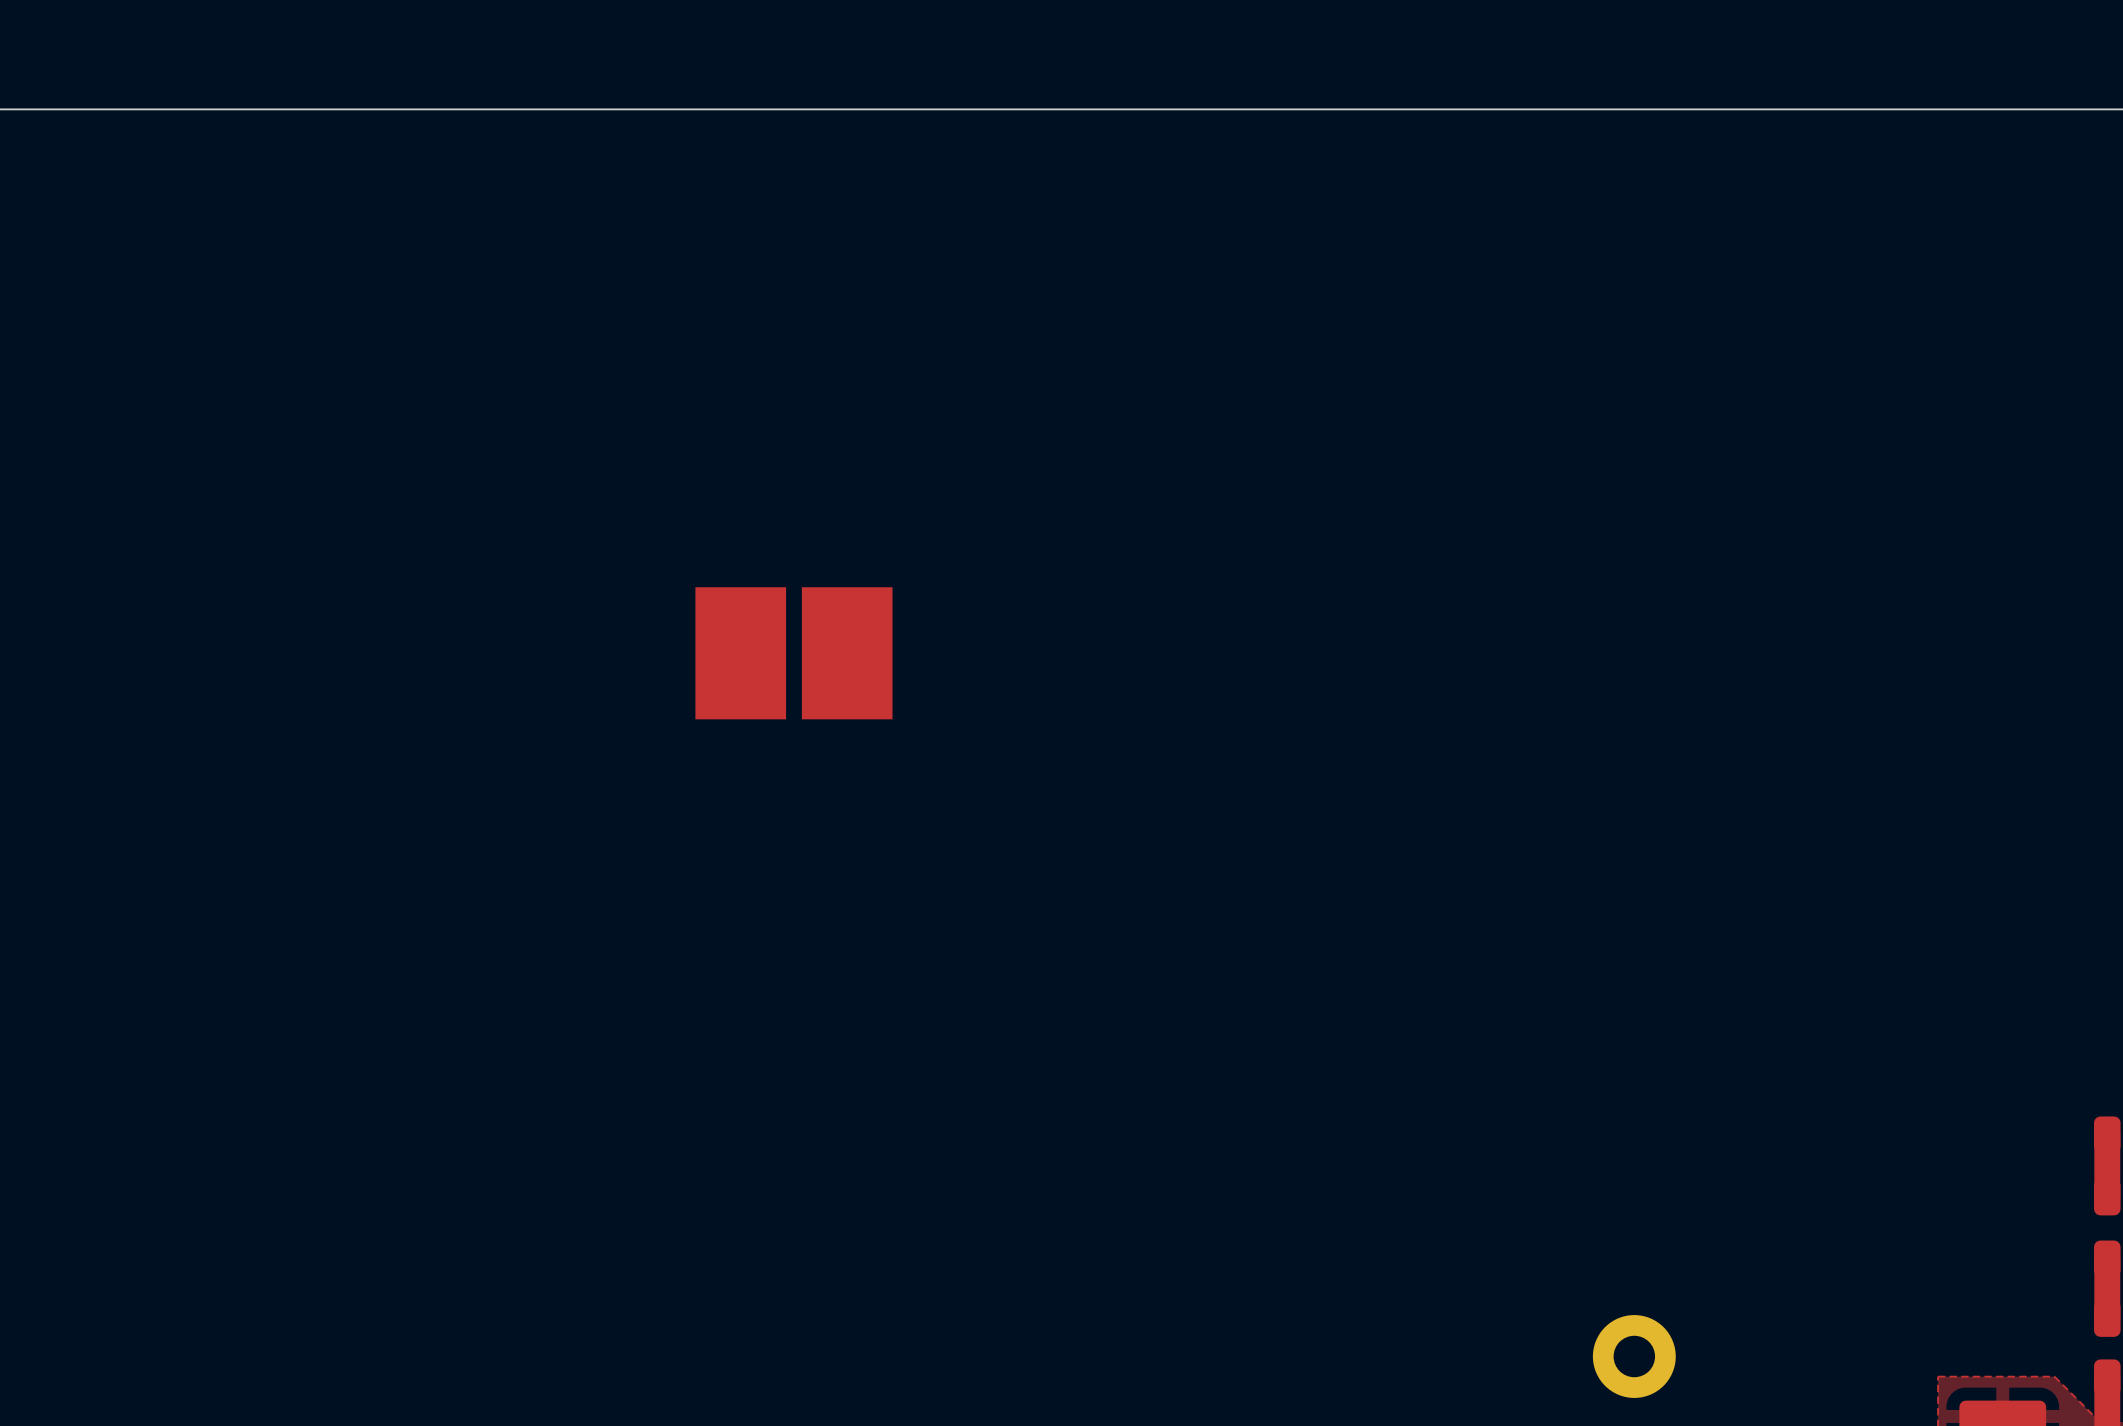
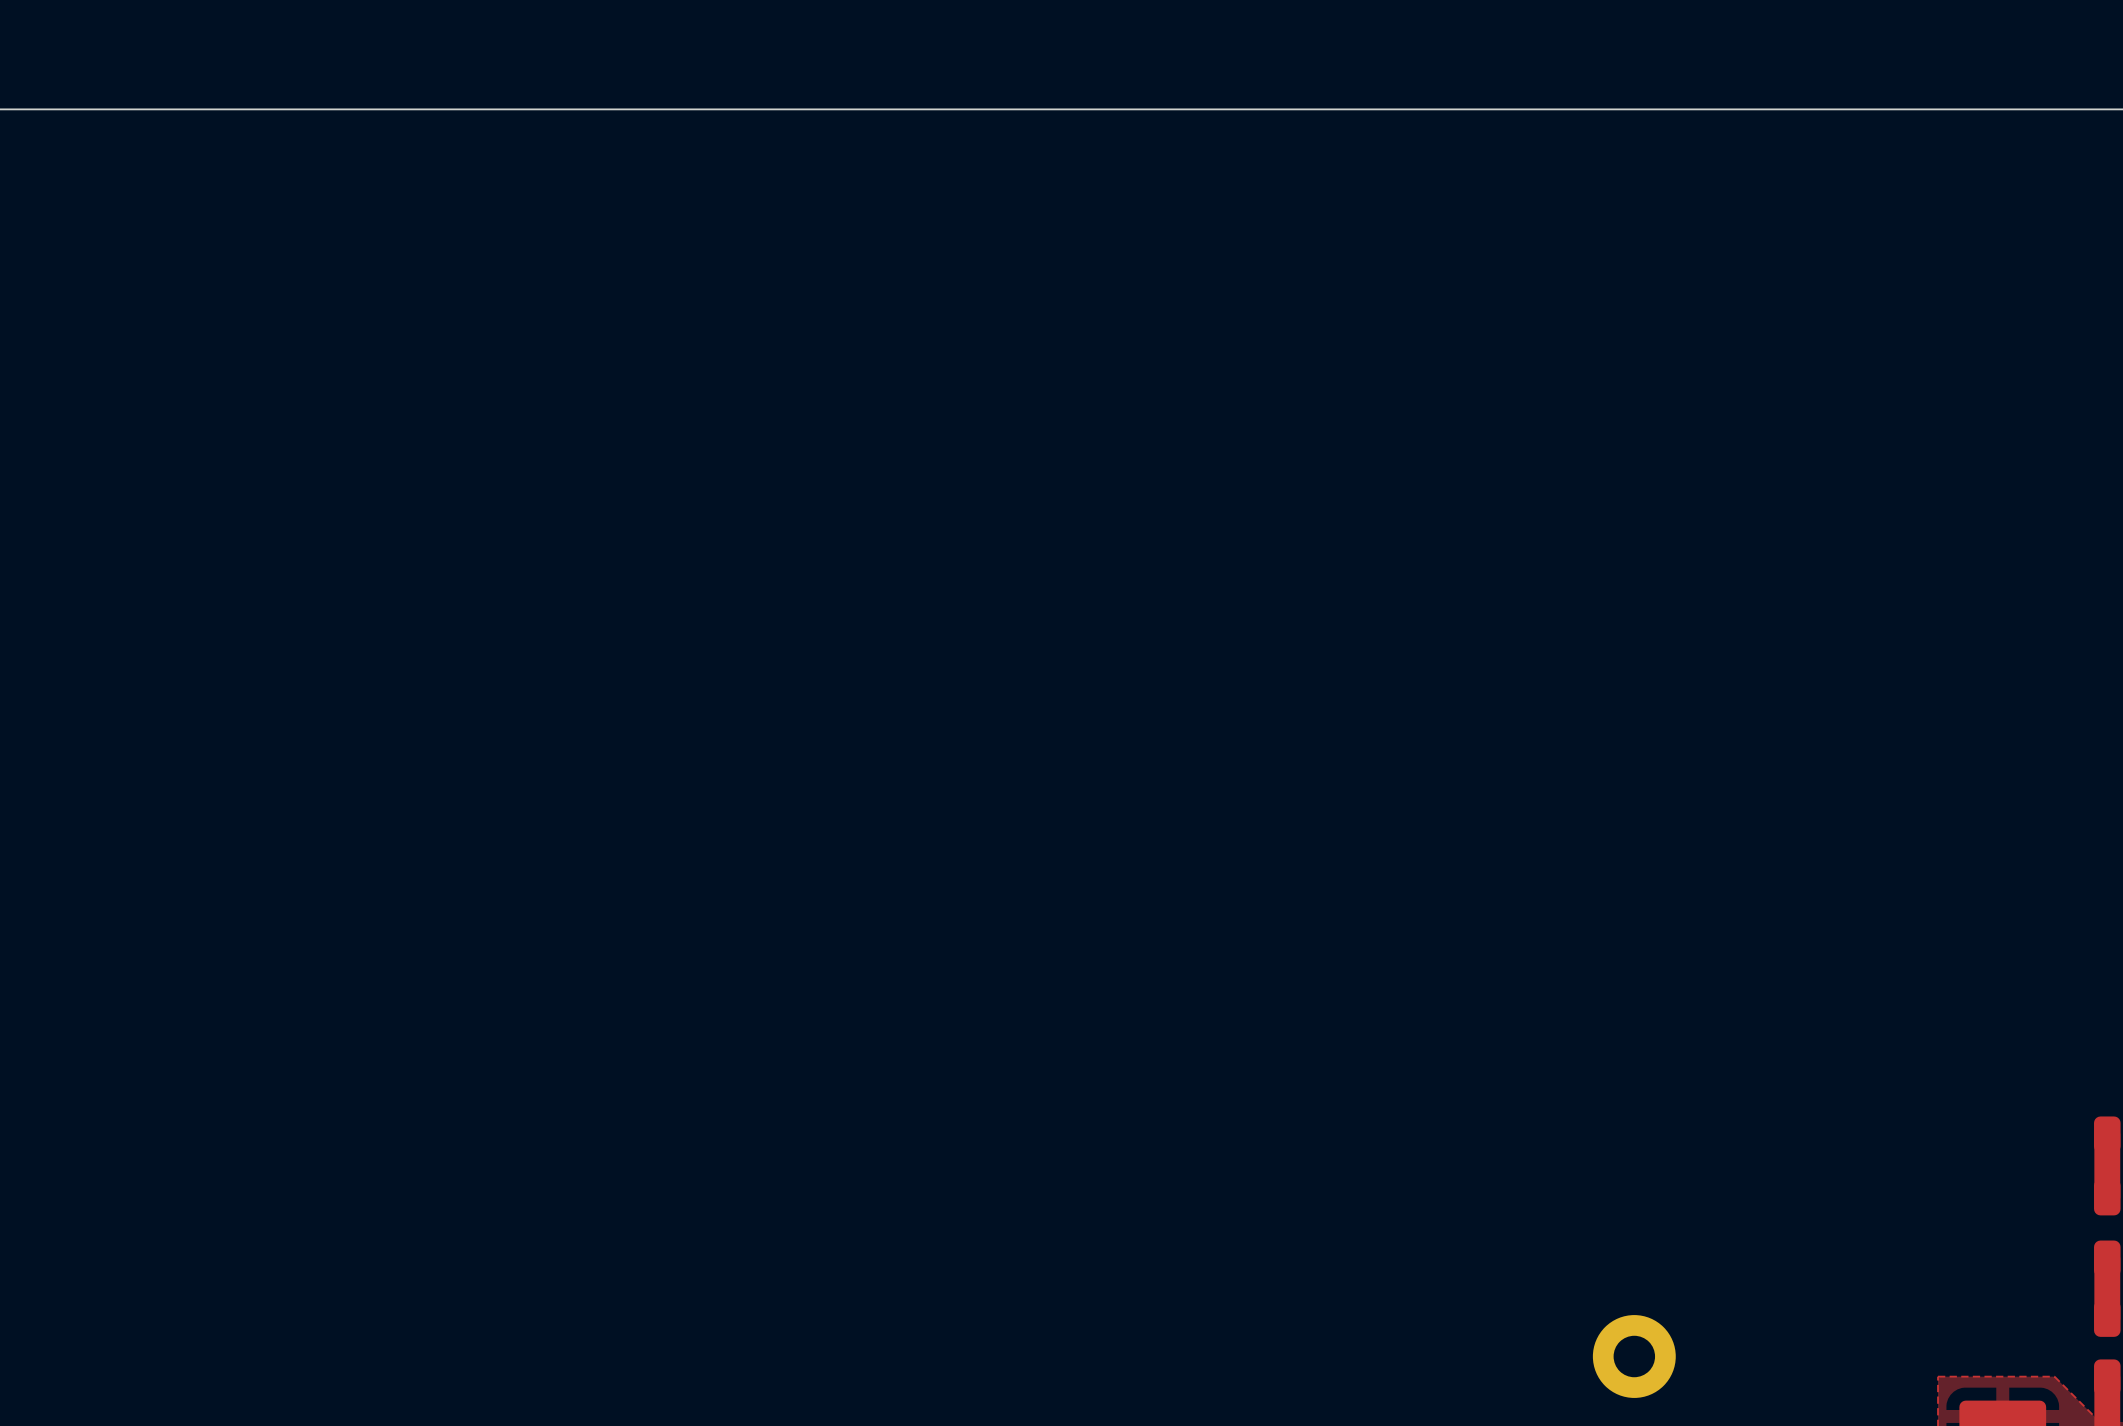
part: (793, 653) -> none

